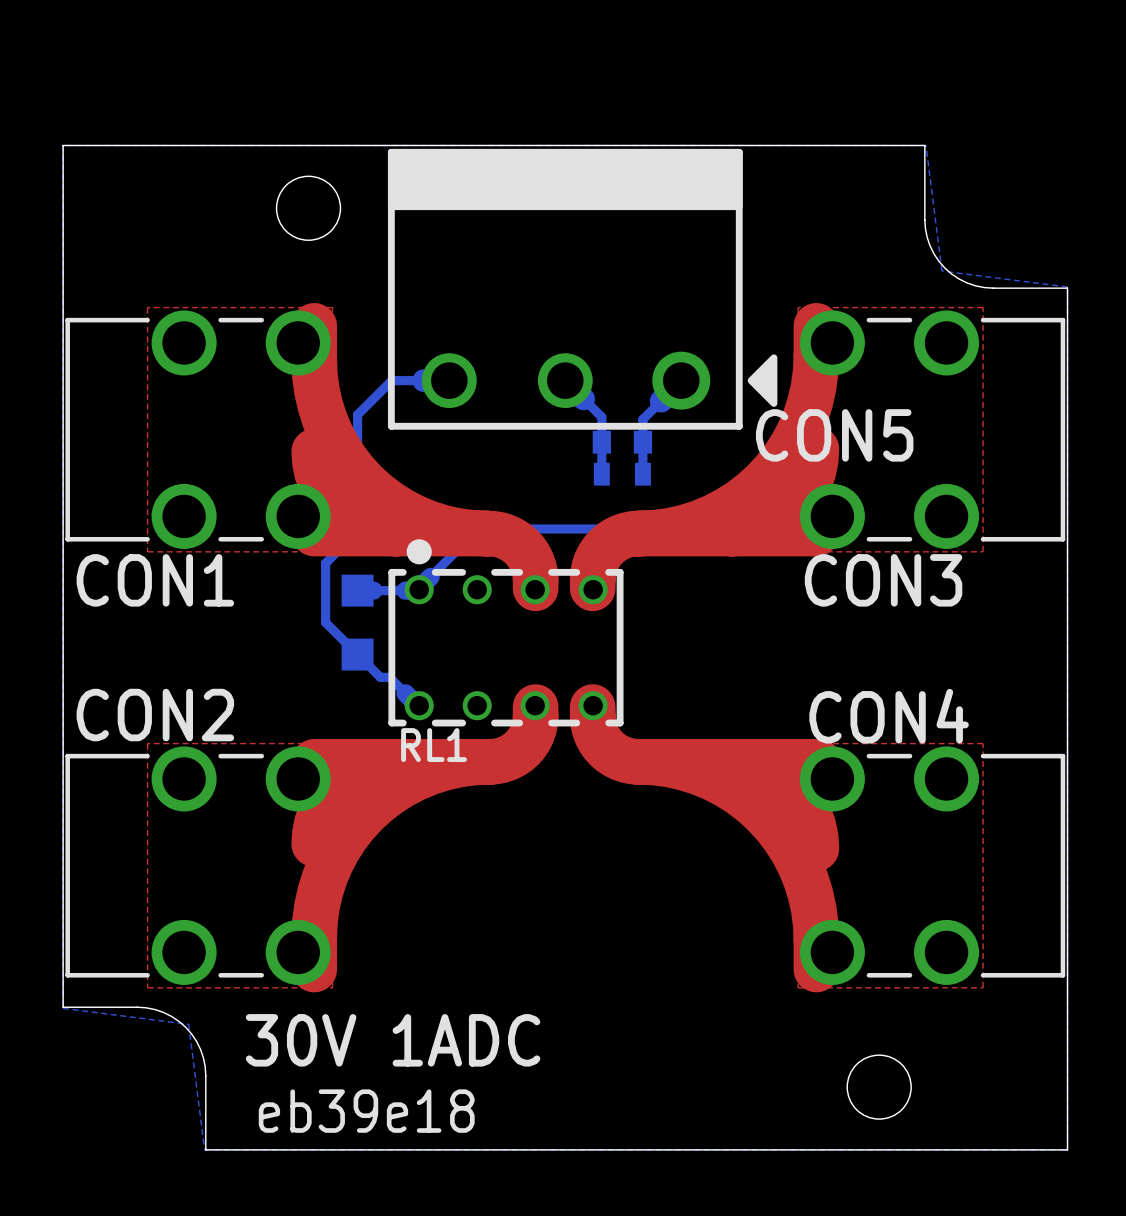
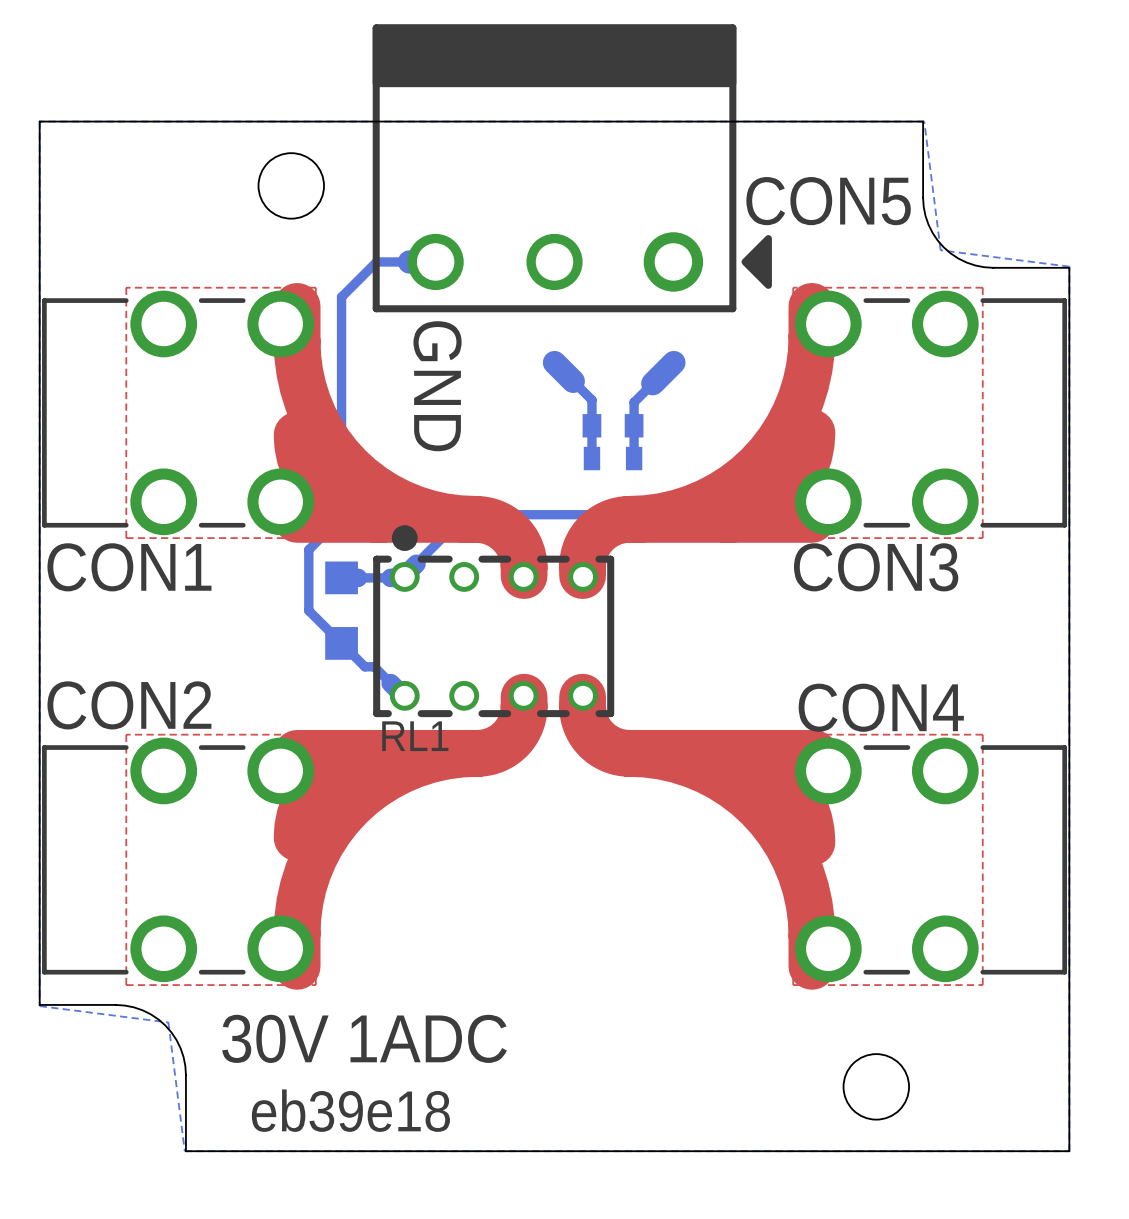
CON5 position: (582, 289) -> (572, 168)
bottom track: (449, 380) (448, 382) (444, 382) (444, 380) (391, 380) (357, 414) -> (435, 261) (435, 264) (430, 264) (430, 261) (376, 261) (341, 297) (341, 397)
text: none -> GND (437, 386)
CON5 name position: CON5 (834, 435) -> CON5 (828, 201)

